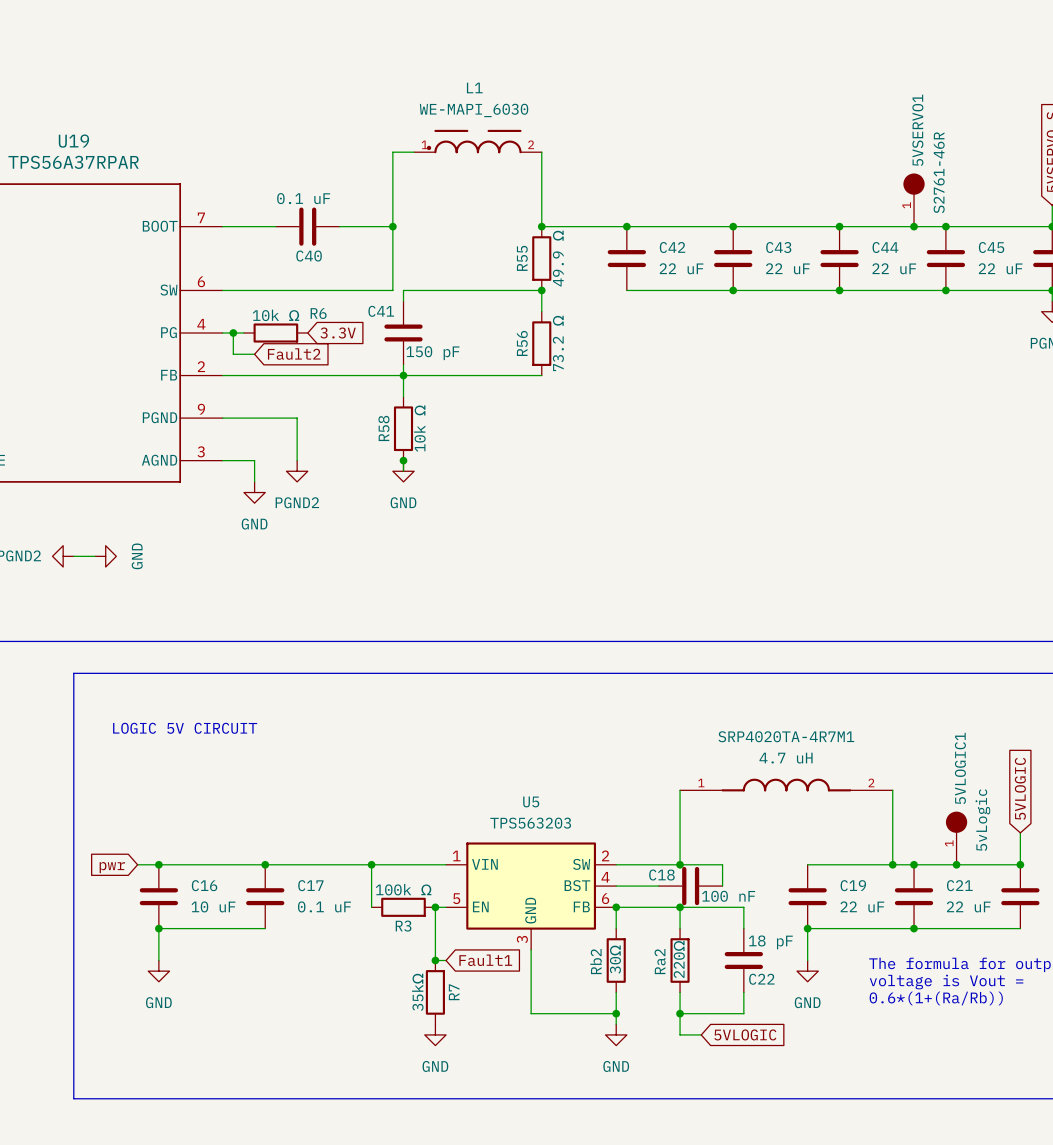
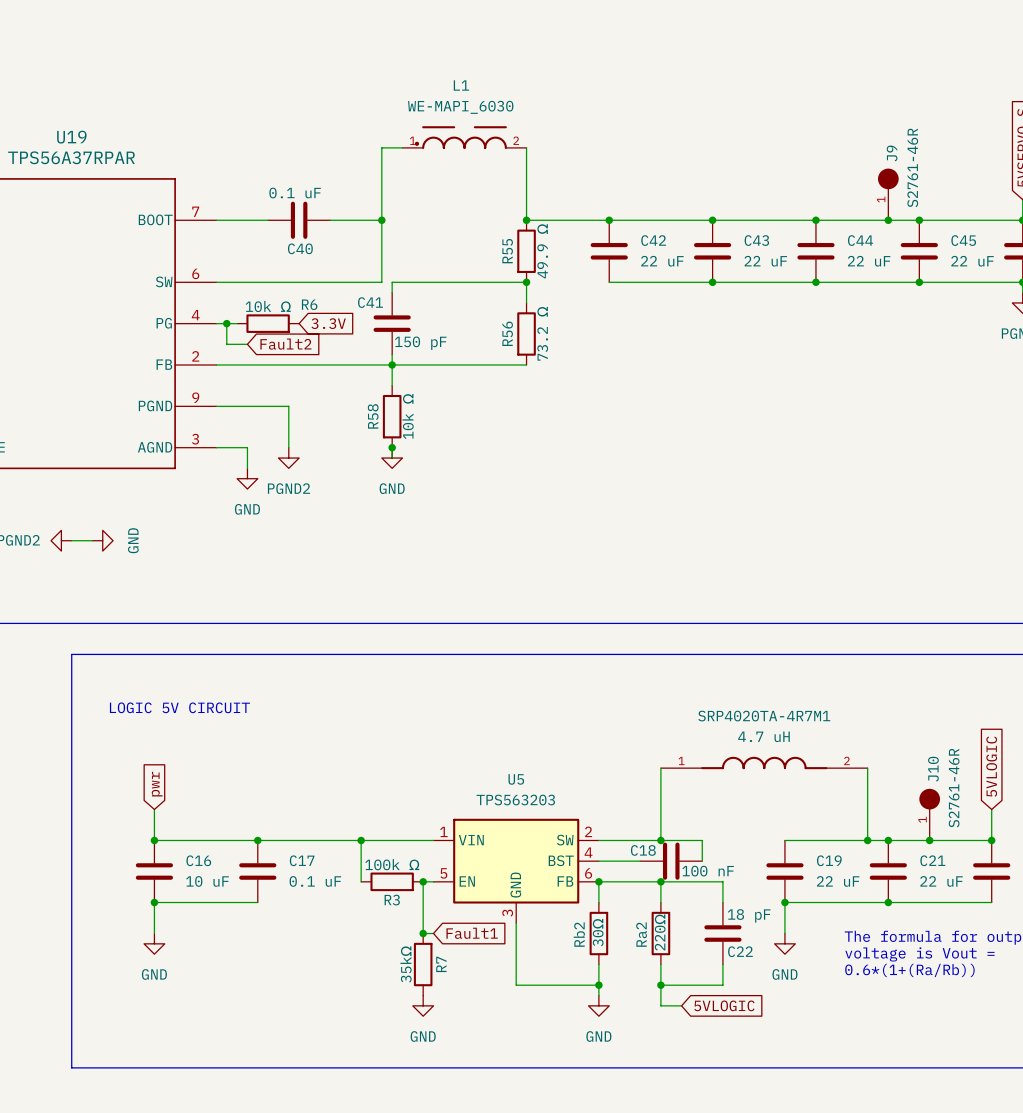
5VSERVO1 name: 5VSERVO1 (917, 130) -> J9 (892, 153)
5VLOGIC1 name: 5VLOGIC1 (960, 768) -> J10 (933, 769)
5VLOGIC1 value: 5vLogic (982, 820) -> S2761-46R (954, 788)
wire: (137, 864) (158, 864) -> (154, 809) (154, 840)
global label rotation: 0° (112, 867) -> 90° clockwise (157, 784)
global label position: pwr (112, 867) -> pwr (157, 784)

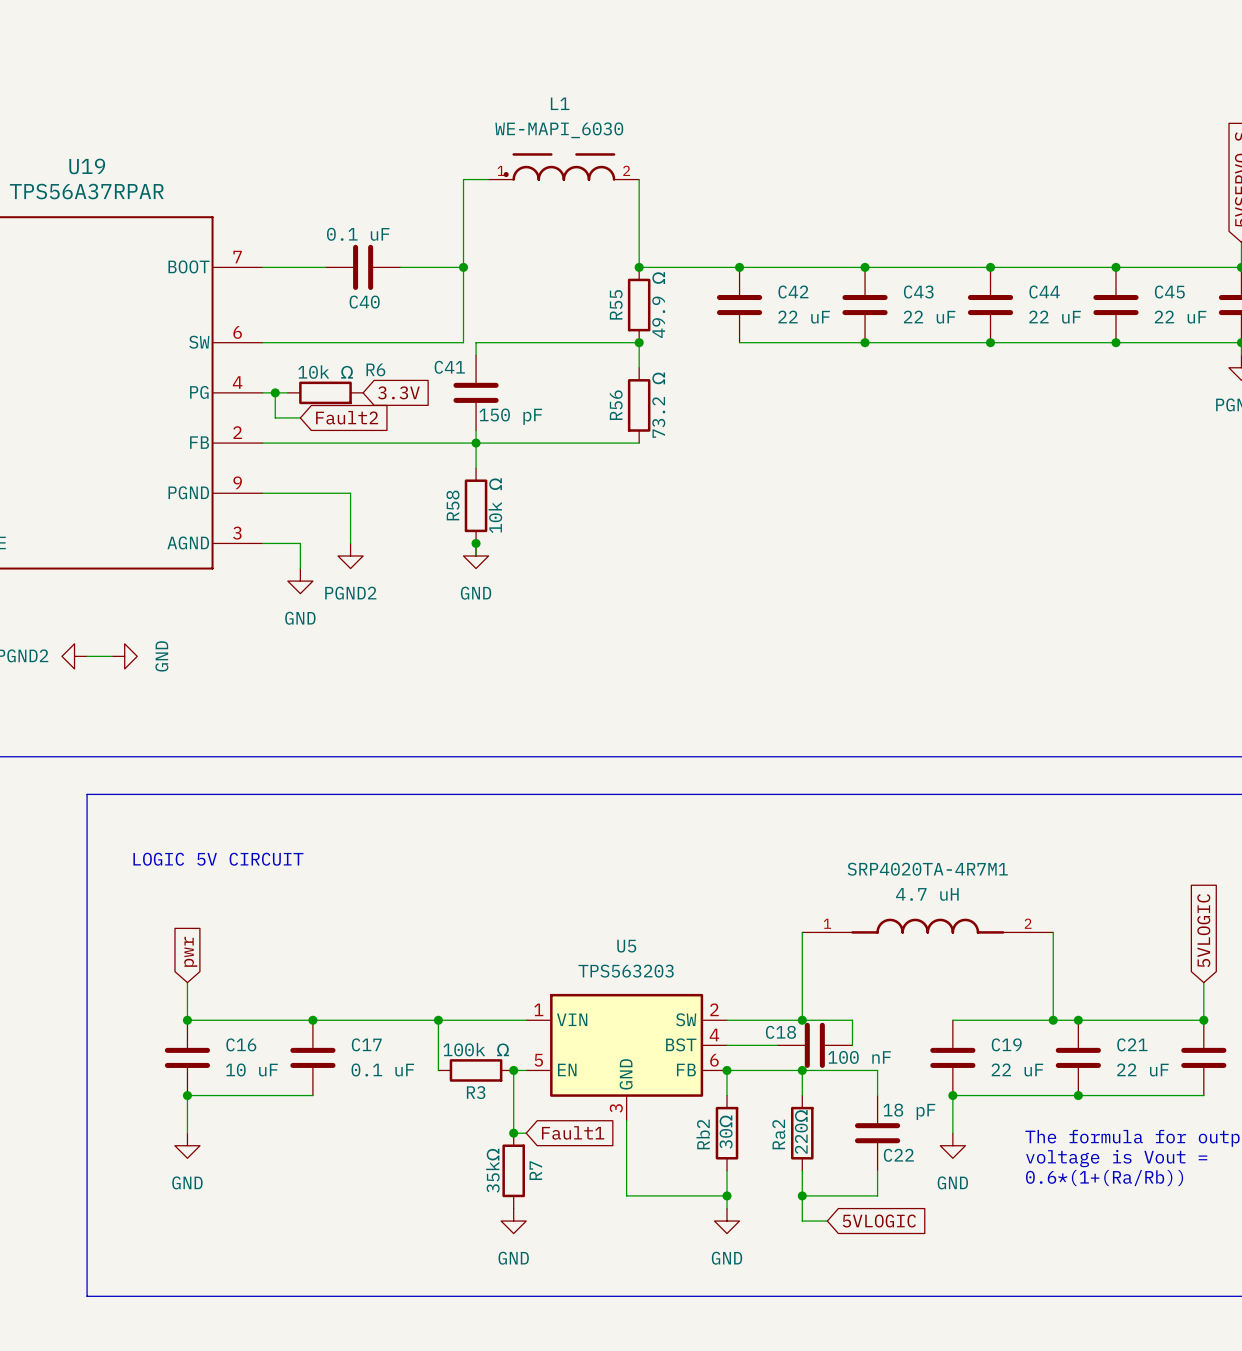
J9: S2761-46R (888, 194) -> none
junction: (888, 220) -> none
J10: S2761-46R (929, 814) -> none
junction: (929, 840) -> none

